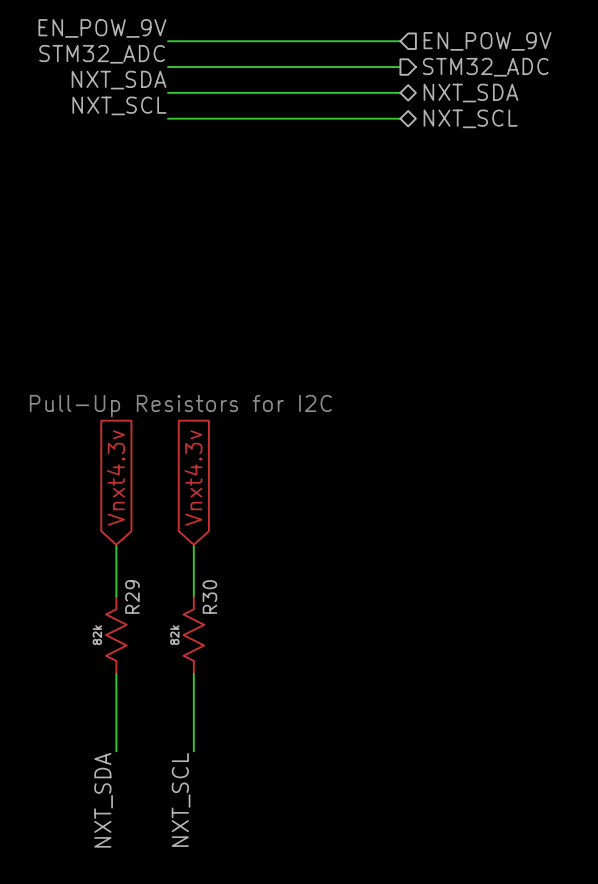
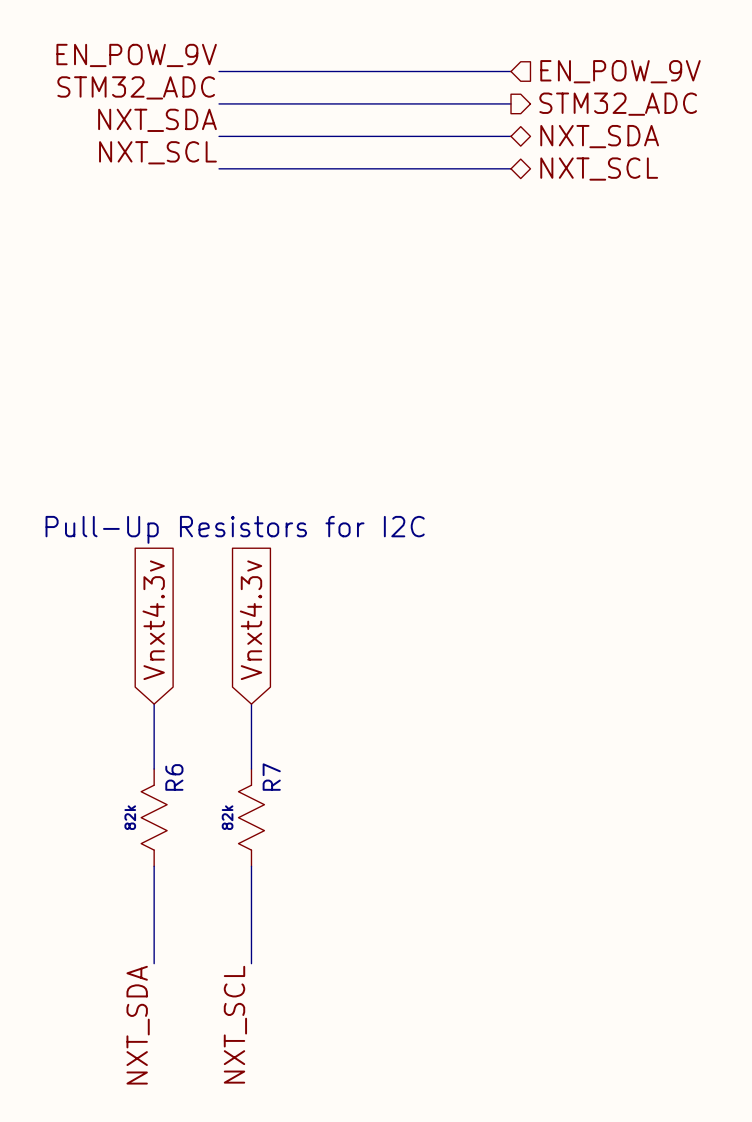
R29 name: R29 (132, 596) -> R6 (174, 777)
R30 name: R30 (209, 596) -> R7 (271, 777)

